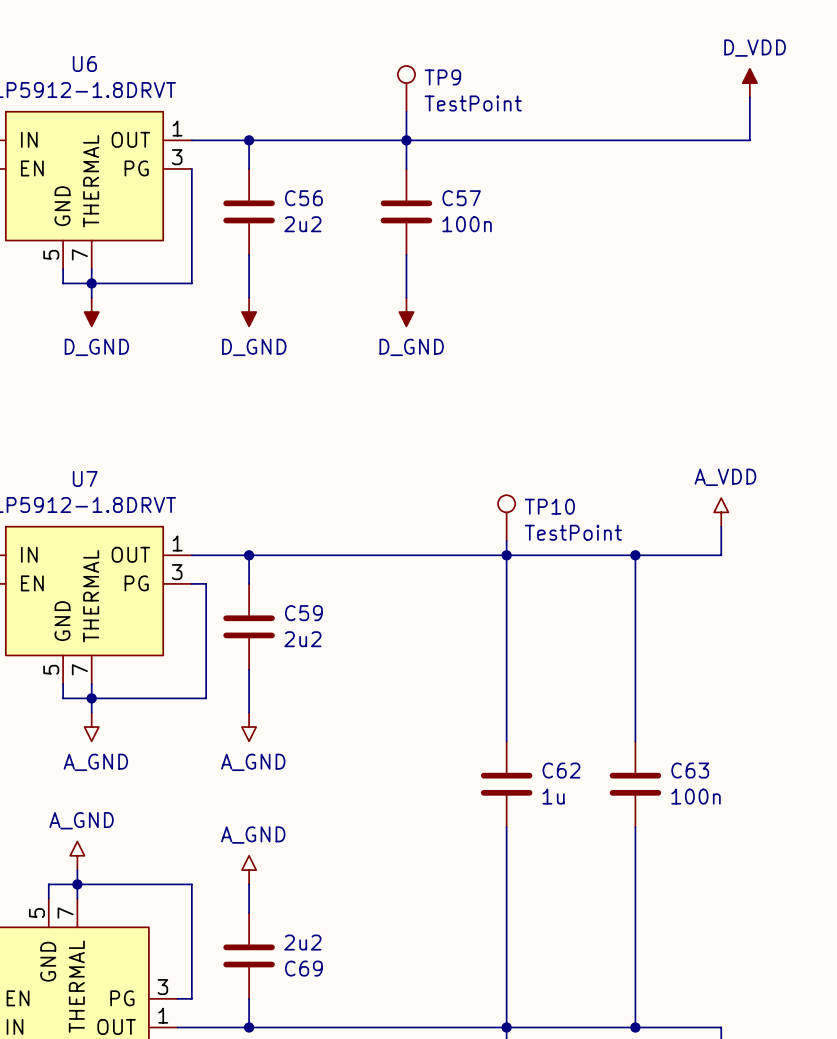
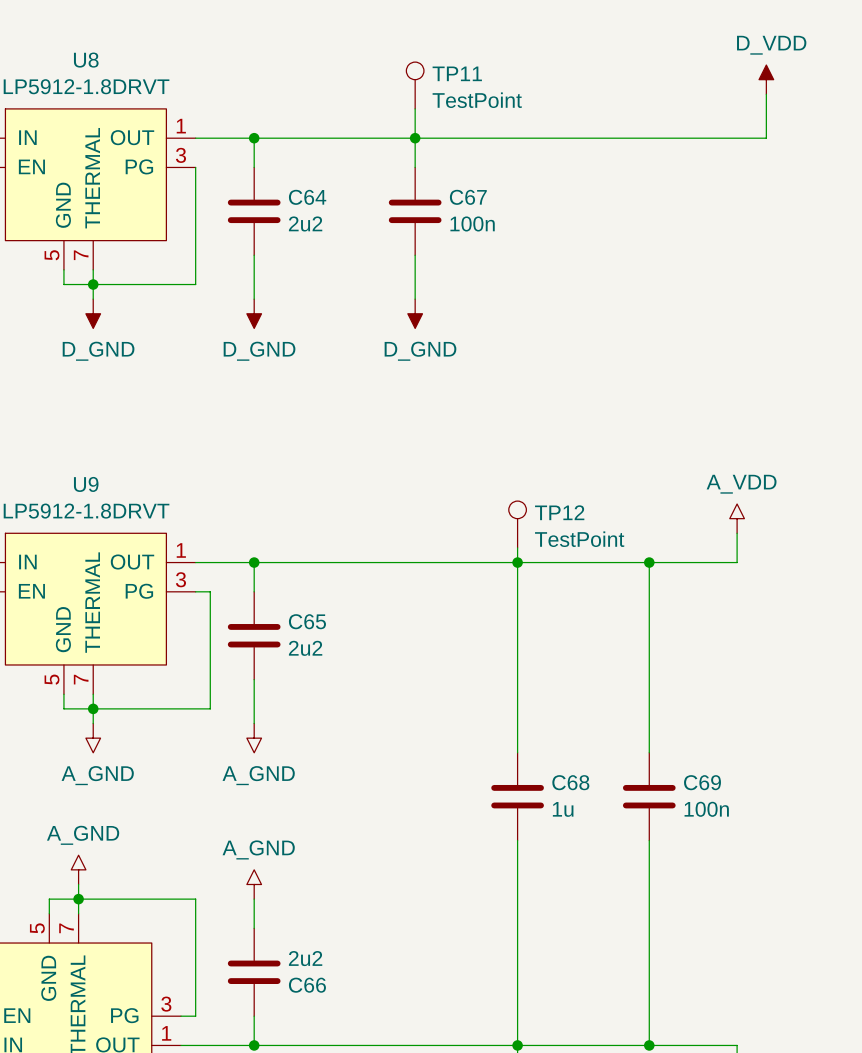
U6 name: U6 (84, 63) -> U8 (86, 60)
TP9 name: TP9 (442, 77) -> TP11 (457, 73)
C56 name: C56 (303, 198) -> C64 (307, 197)
C57 name: C57 (461, 198) -> C67 (468, 197)
U7 name: U7 (85, 478) -> U9 (86, 484)
TP10 name: TP10 (549, 506) -> TP12 (559, 512)
C59 name: C59 (303, 613) -> C65 (307, 621)
C62 name: C62 (561, 770) -> C68 (570, 782)
C63 name: C63 (690, 770) -> C69 (702, 782)
C69 name: C69 (303, 968) -> C66 (307, 985)

